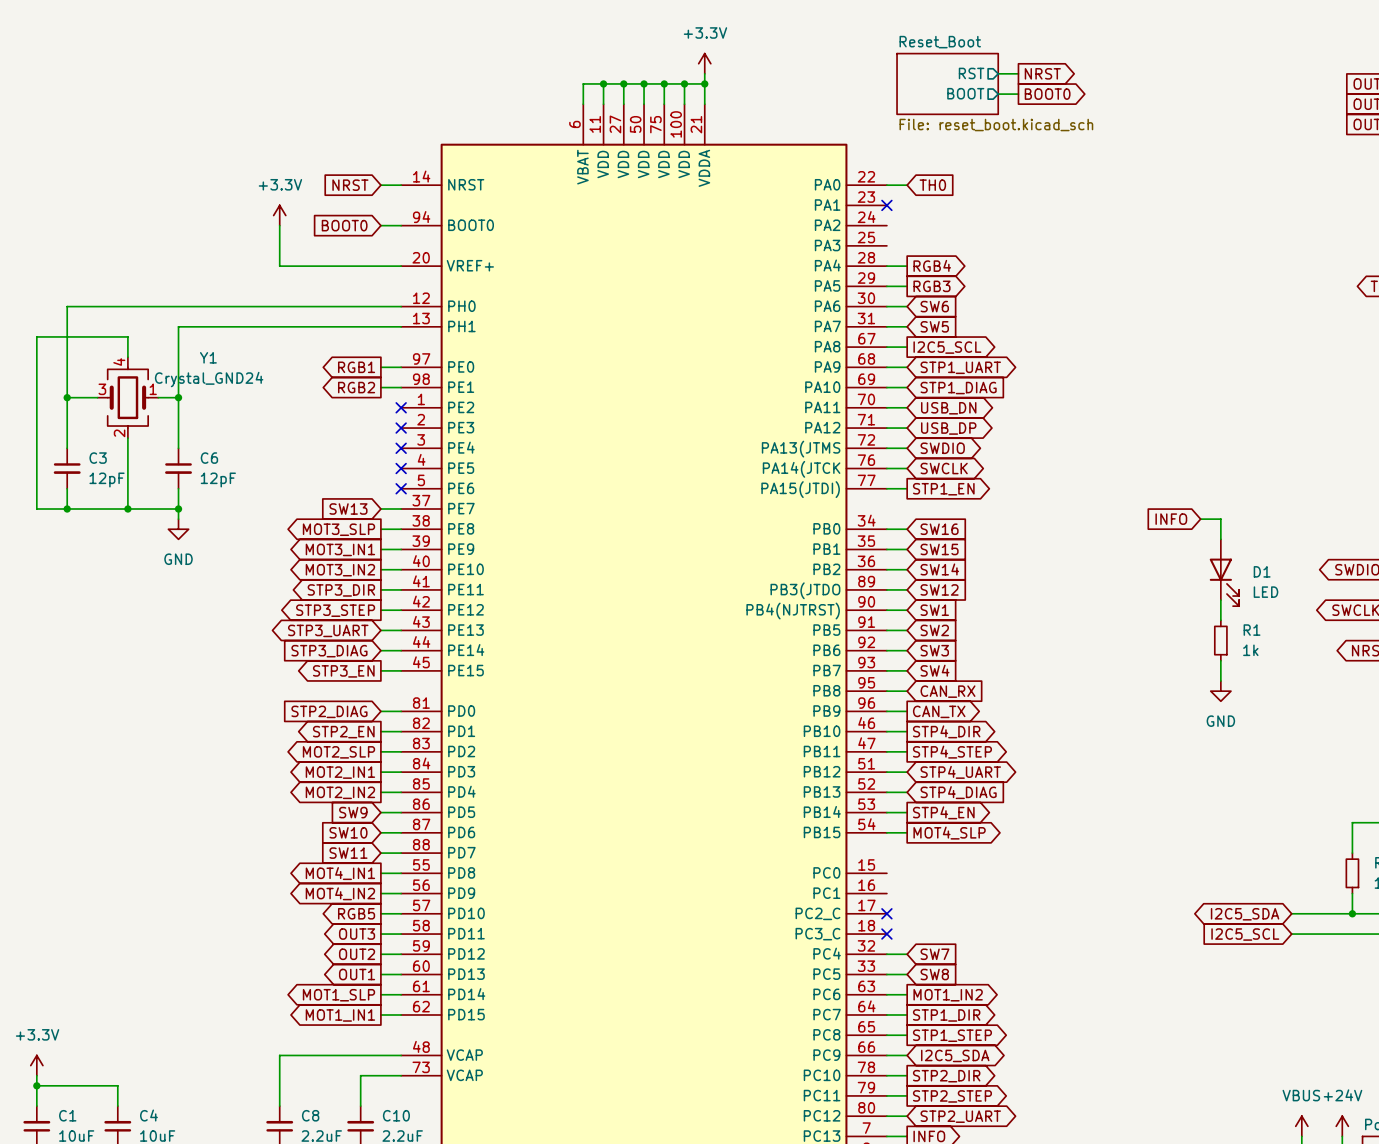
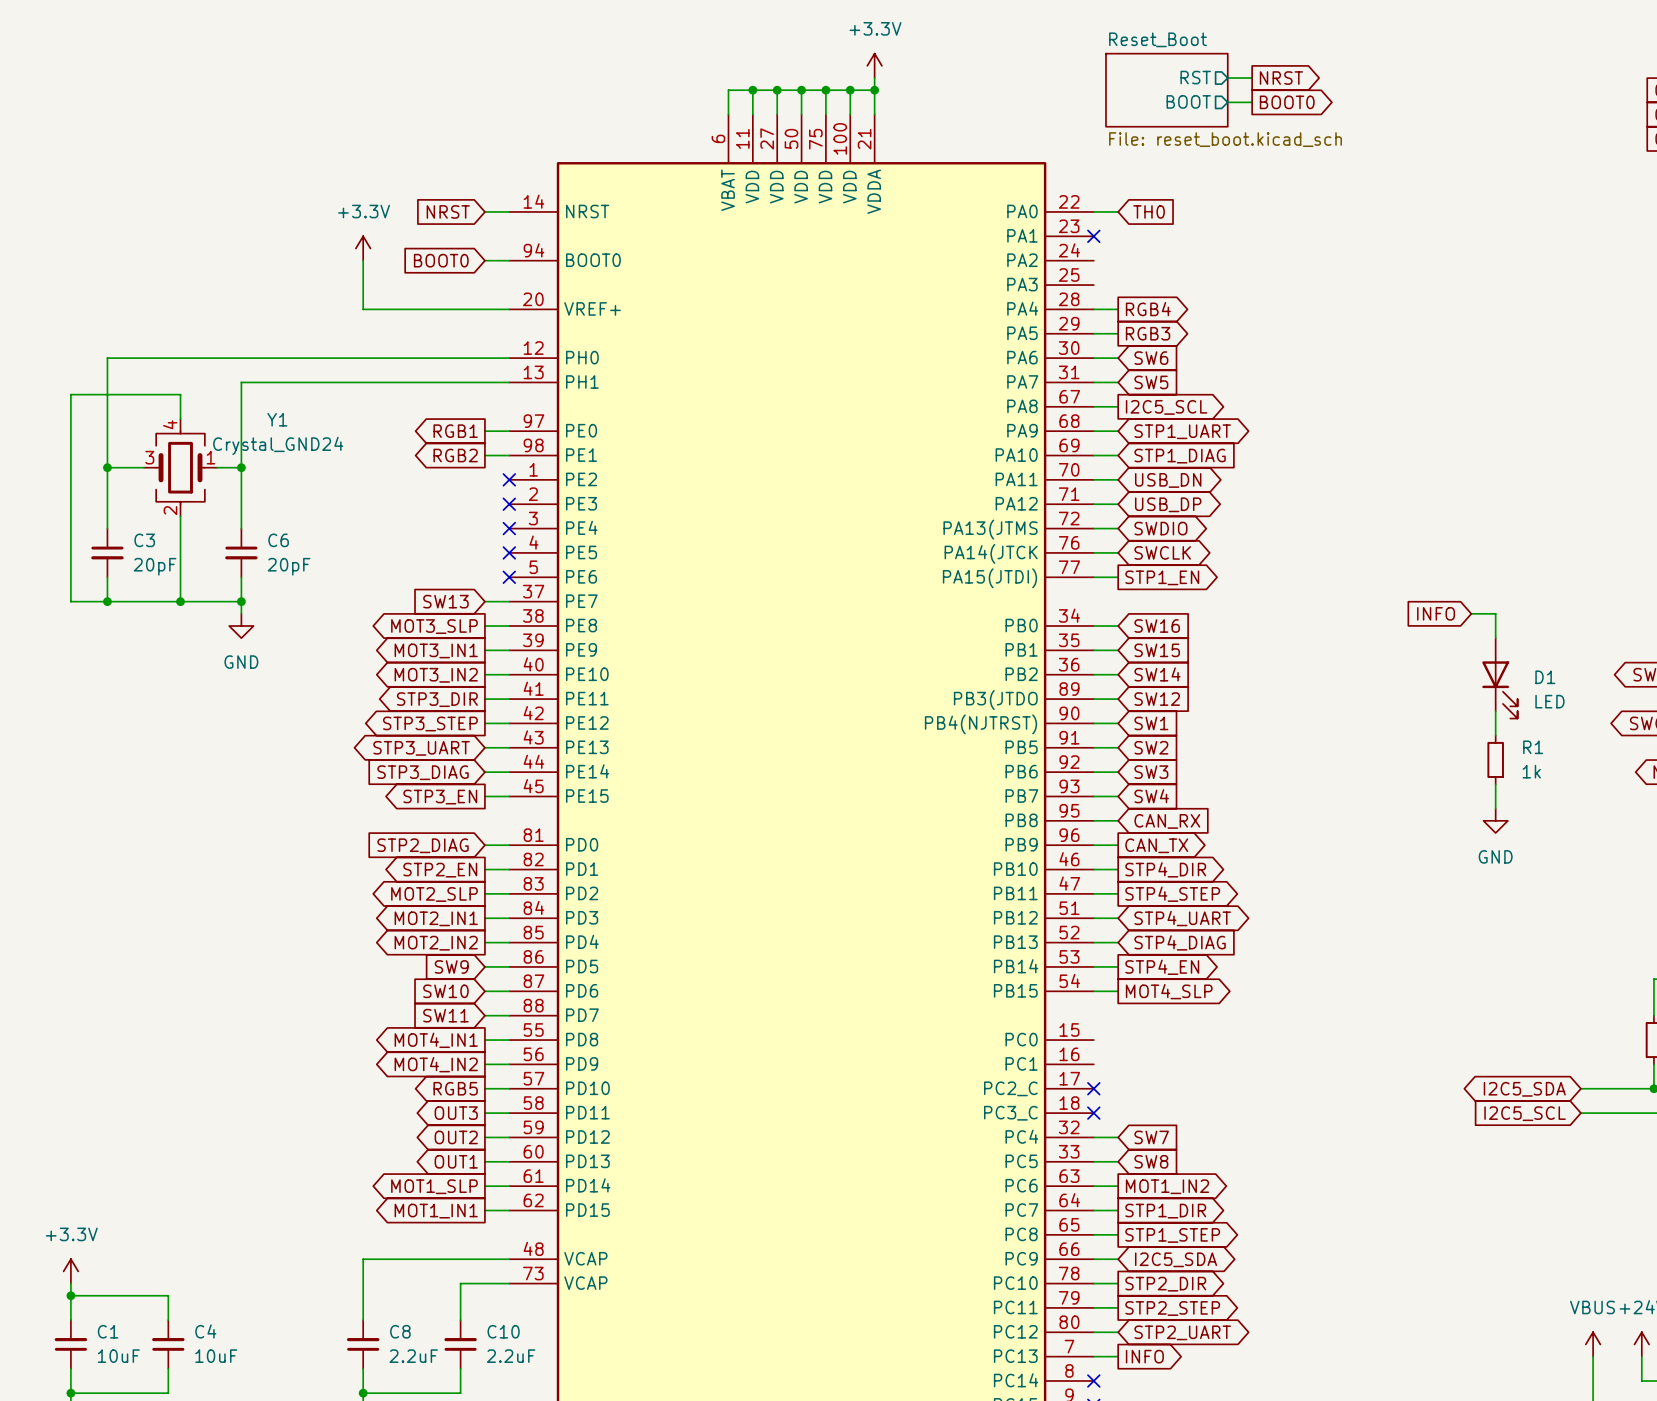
C3 value: 12pF (107, 480) -> 20pF (155, 566)
C6 value: 12pF (218, 480) -> 20pF (289, 566)

